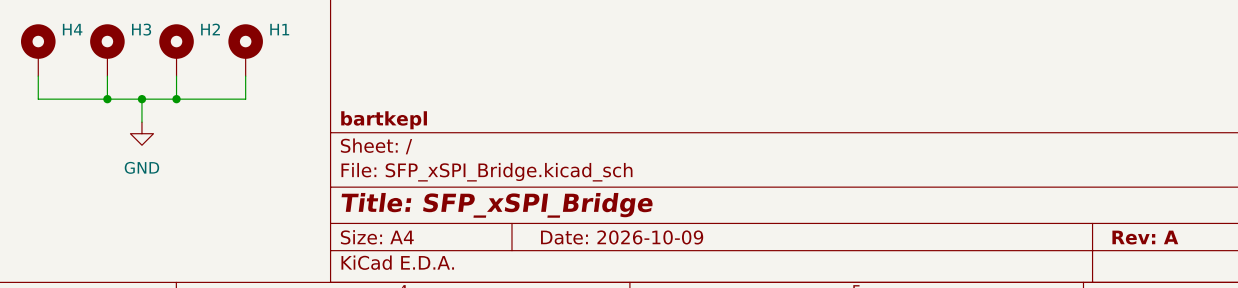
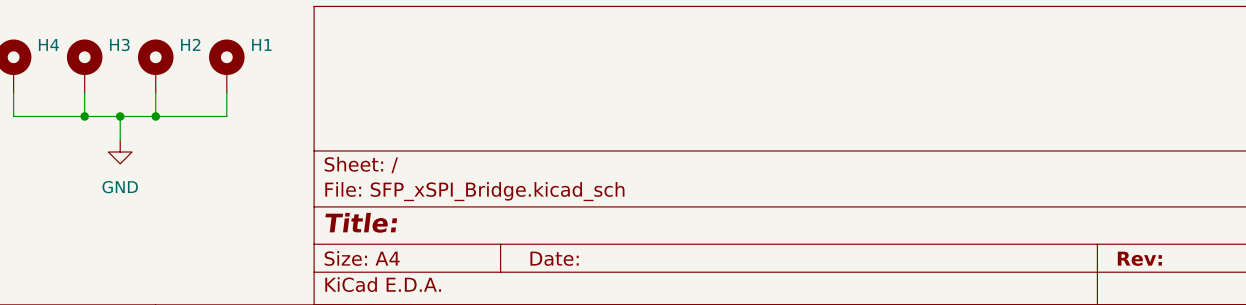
title block: bartkepl (384, 120) -> none
title block: Title: SFP_xSPI_Bridge (497, 205) -> Title: (361, 222)
title block: Date: 2026-10-09 (622, 237) -> Date: (554, 258)
title block: Rev: A (1145, 237) -> Rev: (1139, 258)

